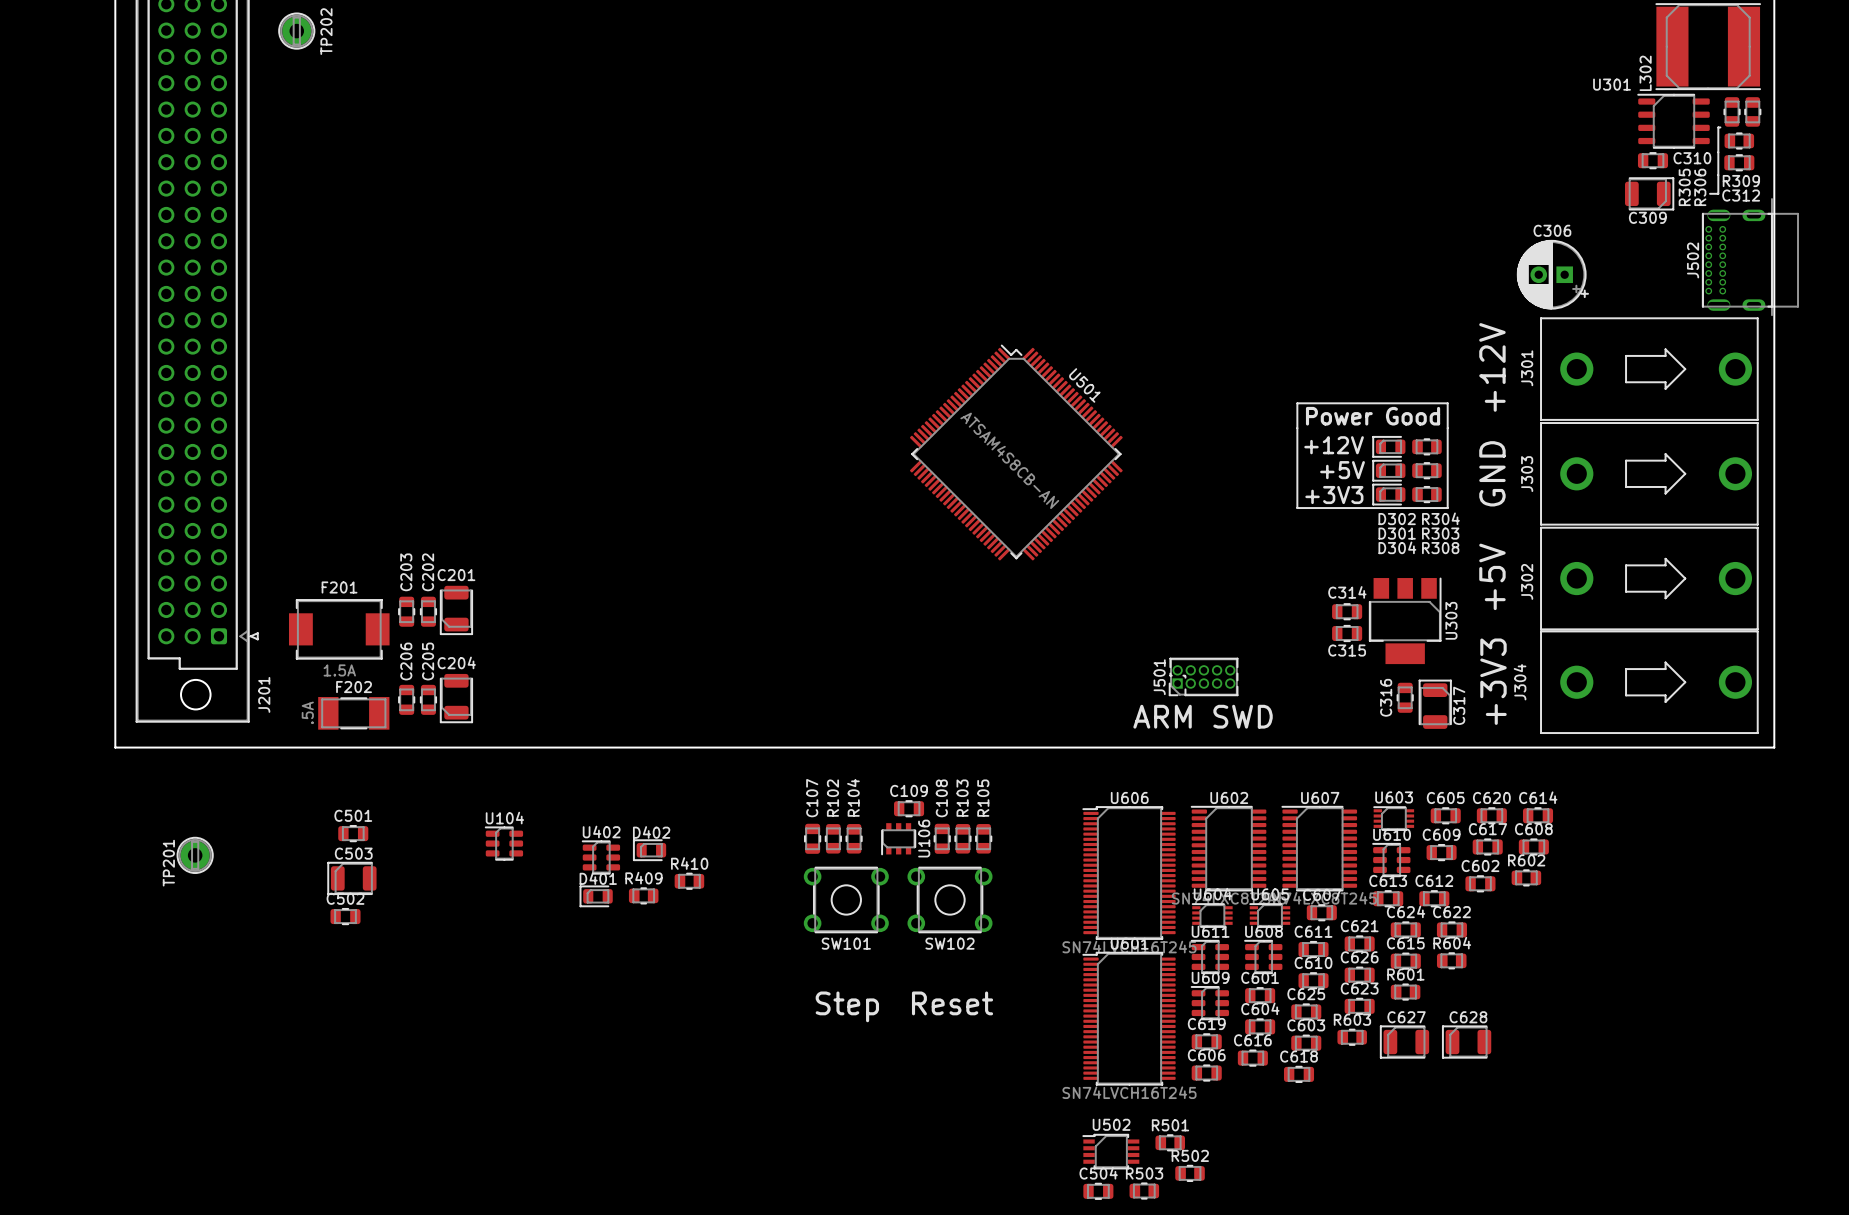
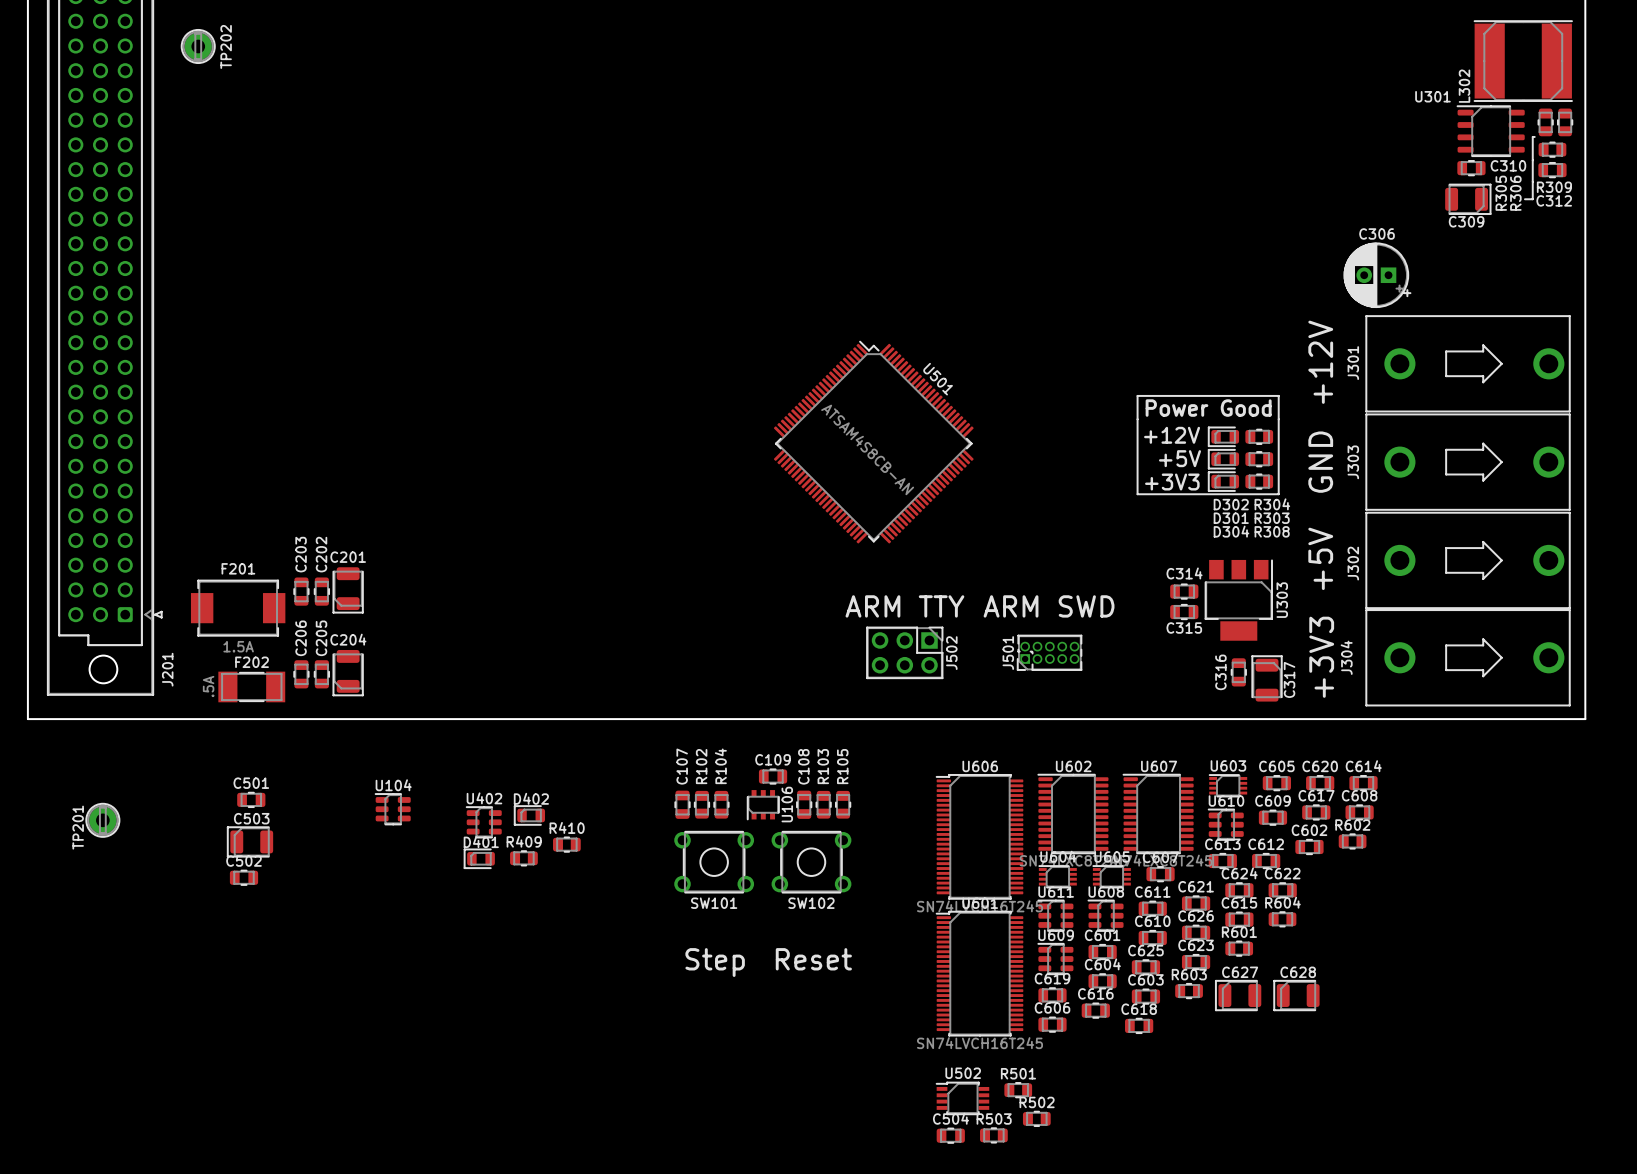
J502 footprint: [1701, 198, 1799, 316] -> [866, 626, 944, 679]
J502 name position: J502 (1693, 260) -> J502 (951, 653)
text: none -> ARM TTY (904, 606)
text position: ARM SWD (1203, 716) -> ARM SWD (1049, 606)

